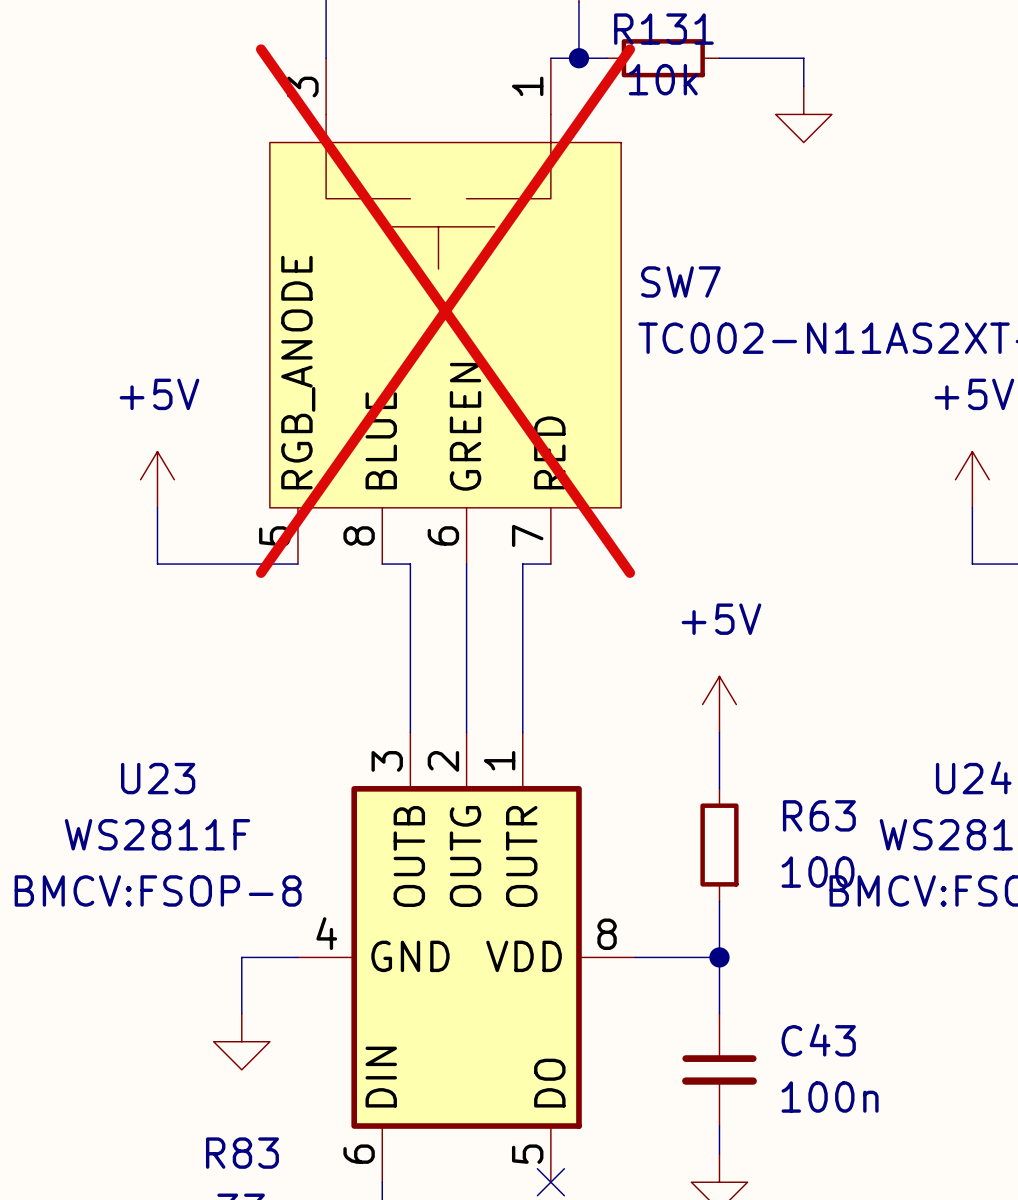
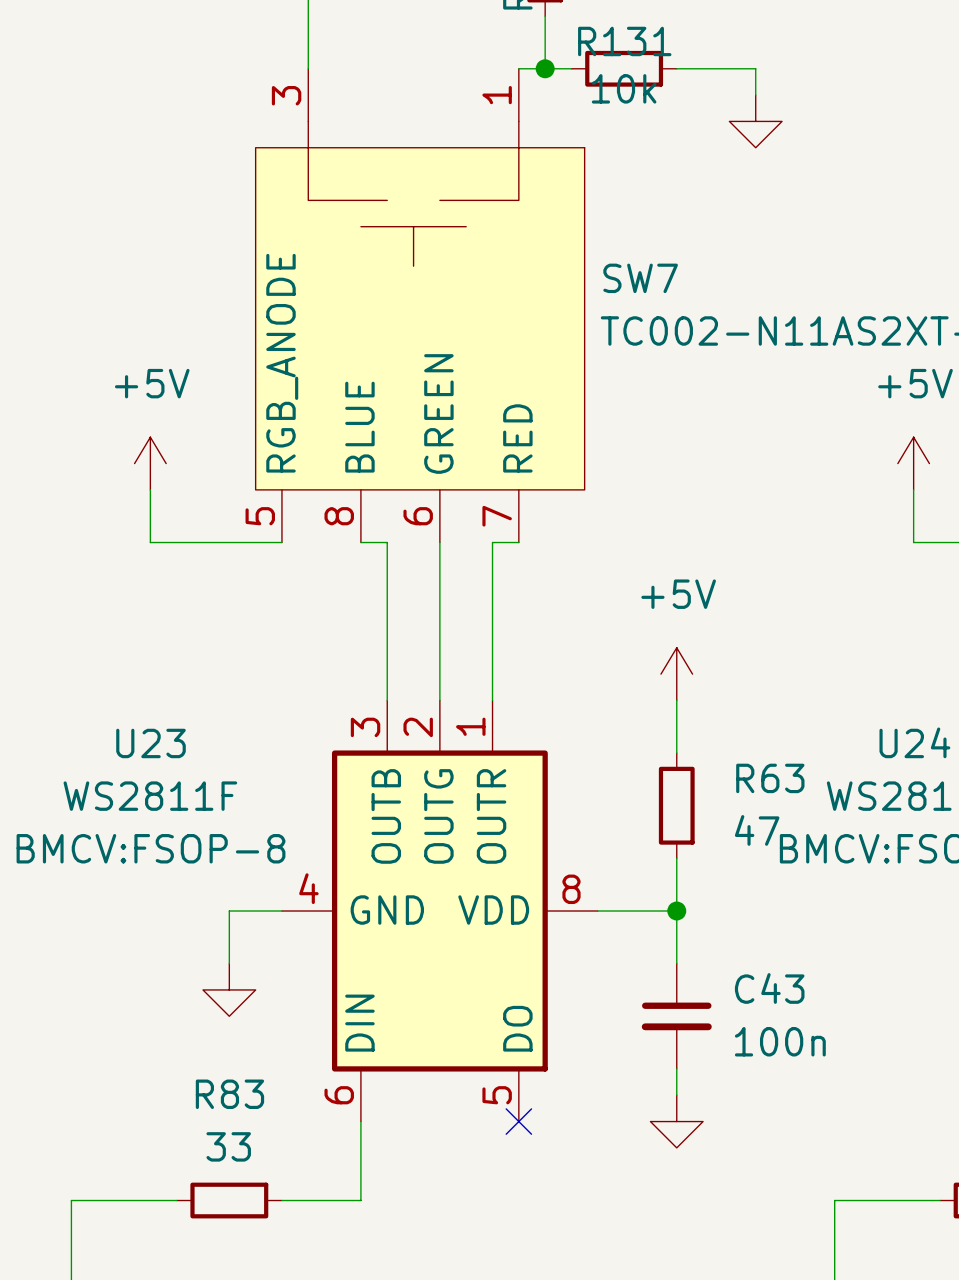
SW7 do-not-place cross: (445, 311) -> none
R63 value: 100 (818, 872) -> 47 (757, 830)

